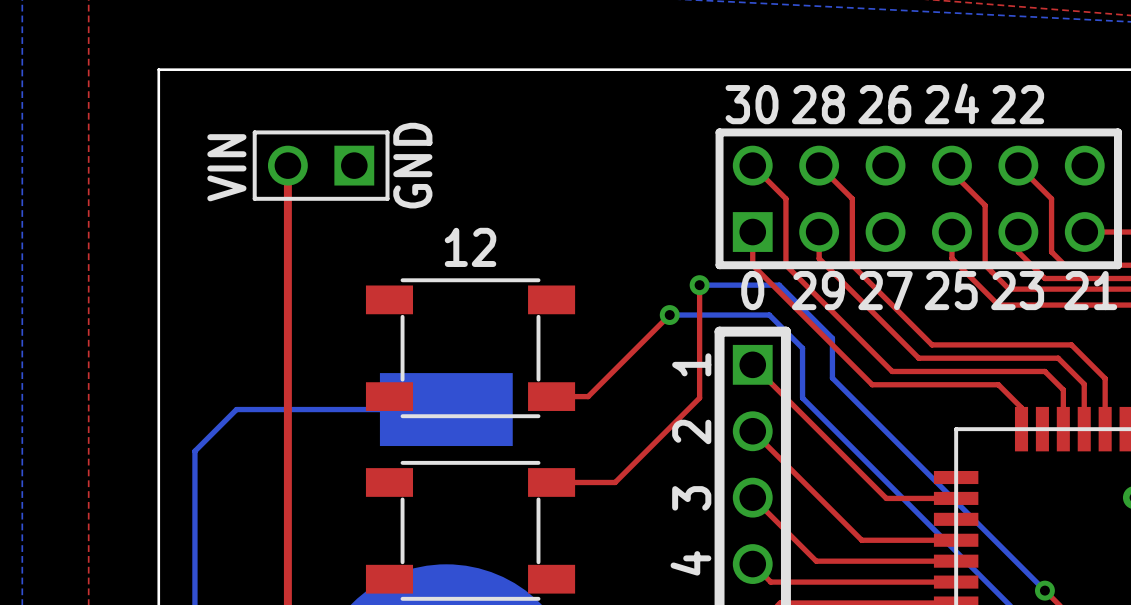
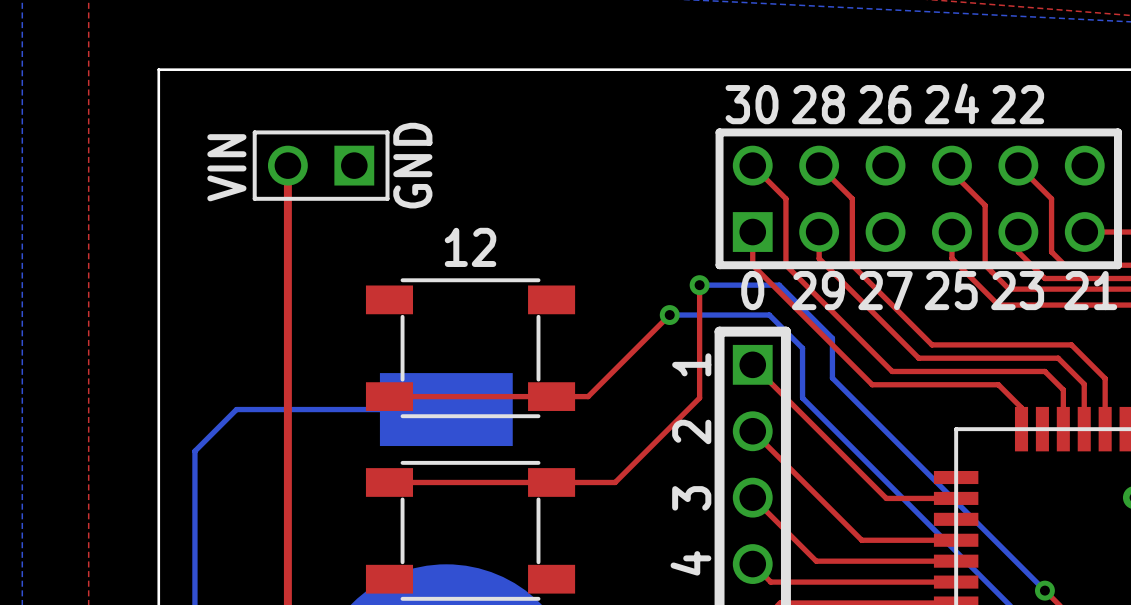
top track: none -> (389, 396) (551, 396)
top track: none -> (389, 482) (551, 482)

